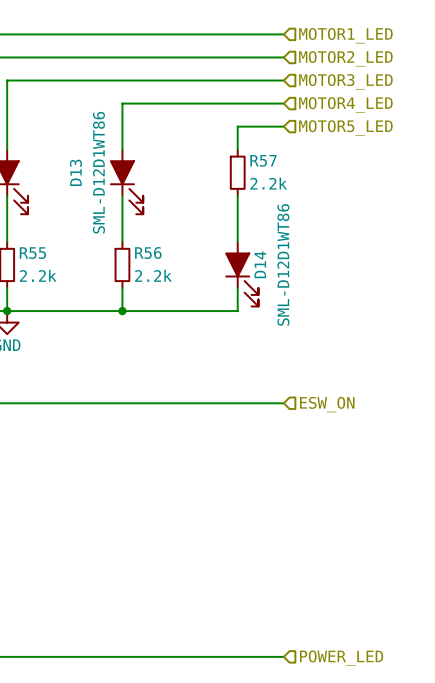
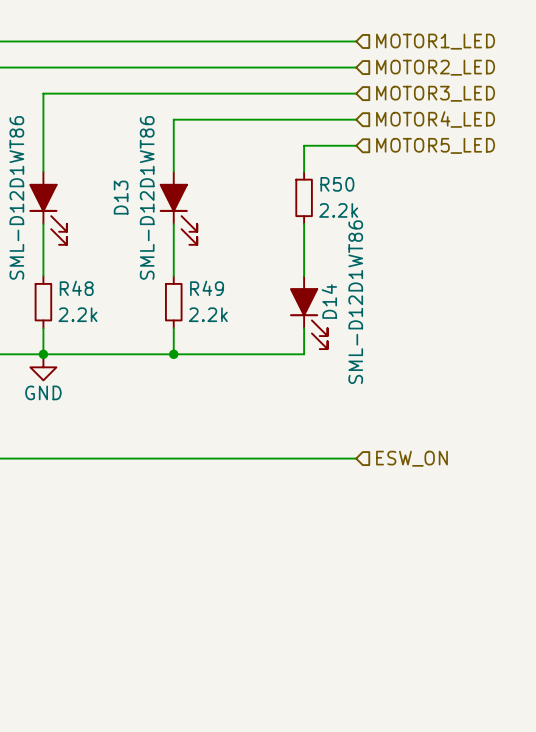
R57 name: R57 (263, 160) -> R50 (337, 184)
R55 name: R55 (32, 253) -> R48 (76, 288)
R56 name: R56 (148, 253) -> R49 (207, 288)

